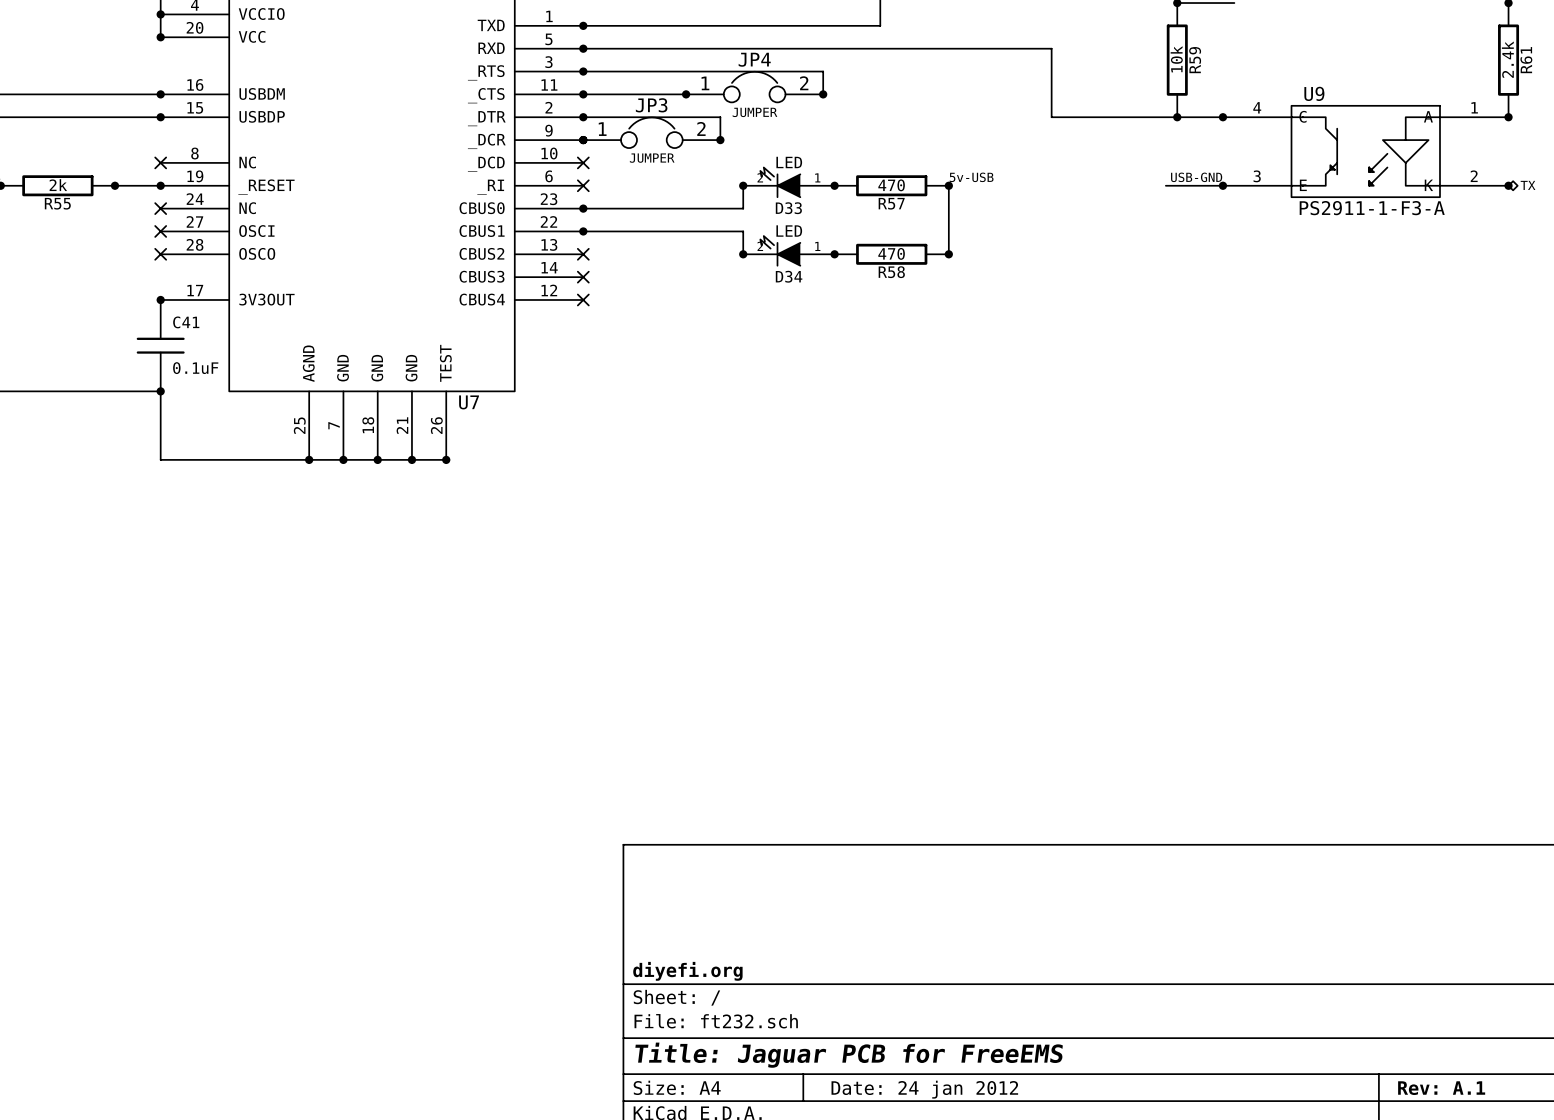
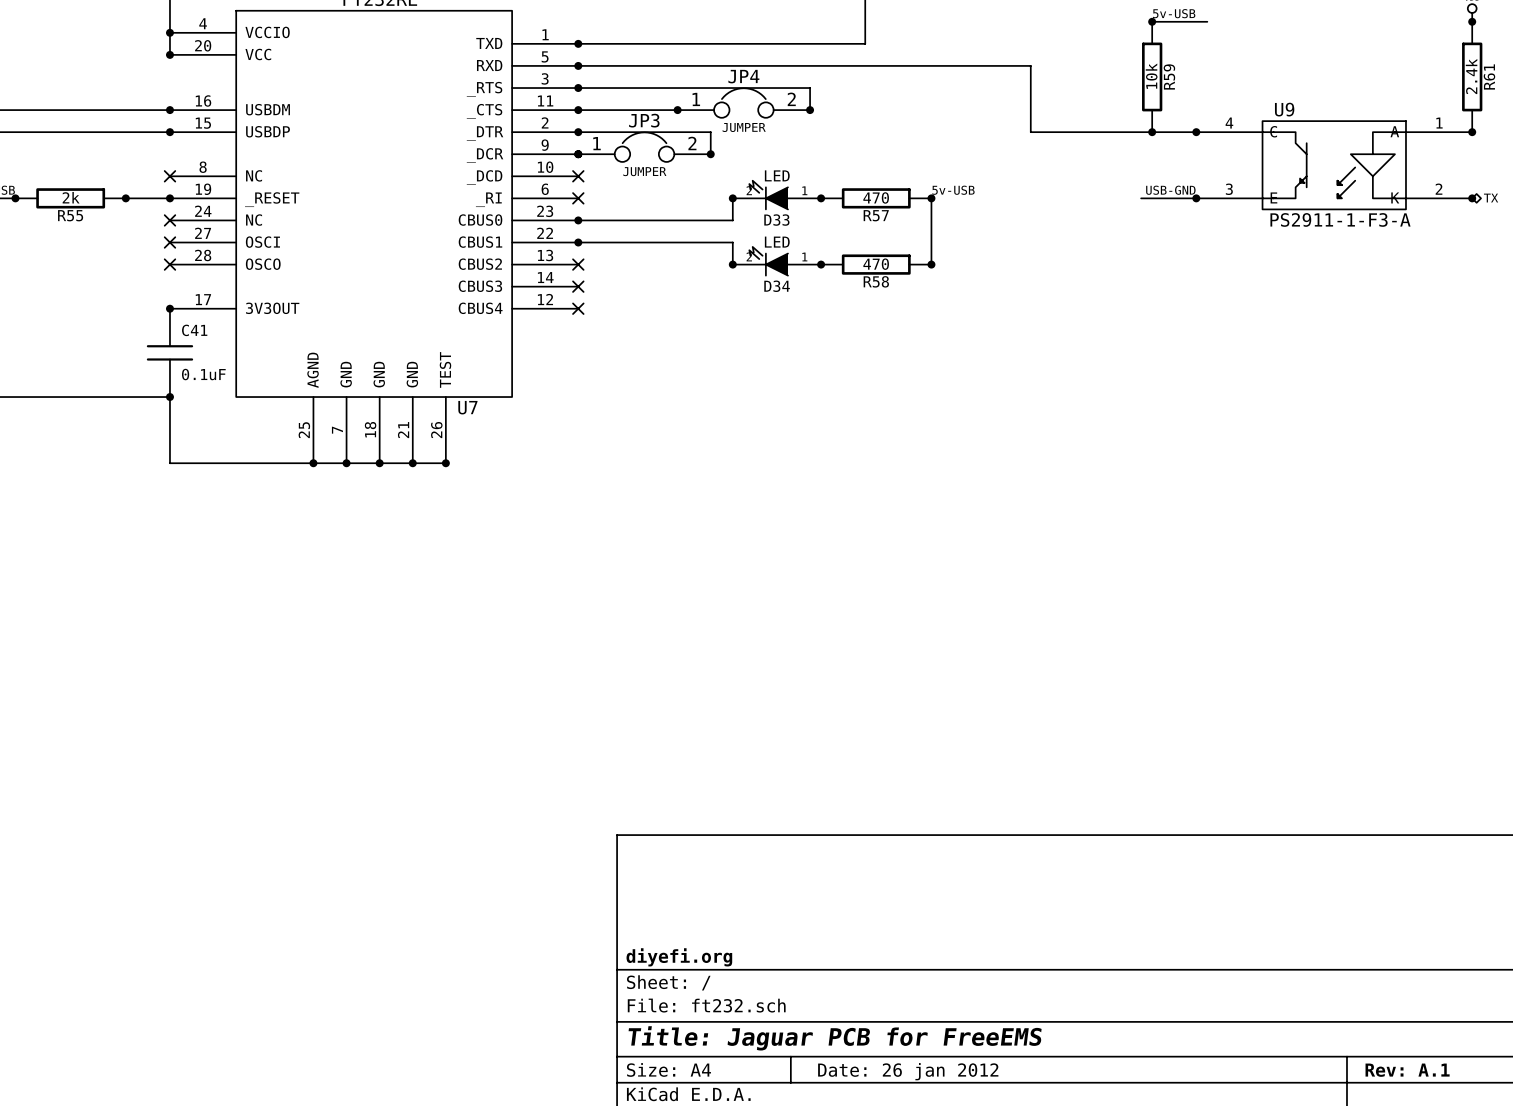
title block: Date: 24 jan 2012 (924, 1089) -> Date: 26 jan 2012 (908, 1071)

